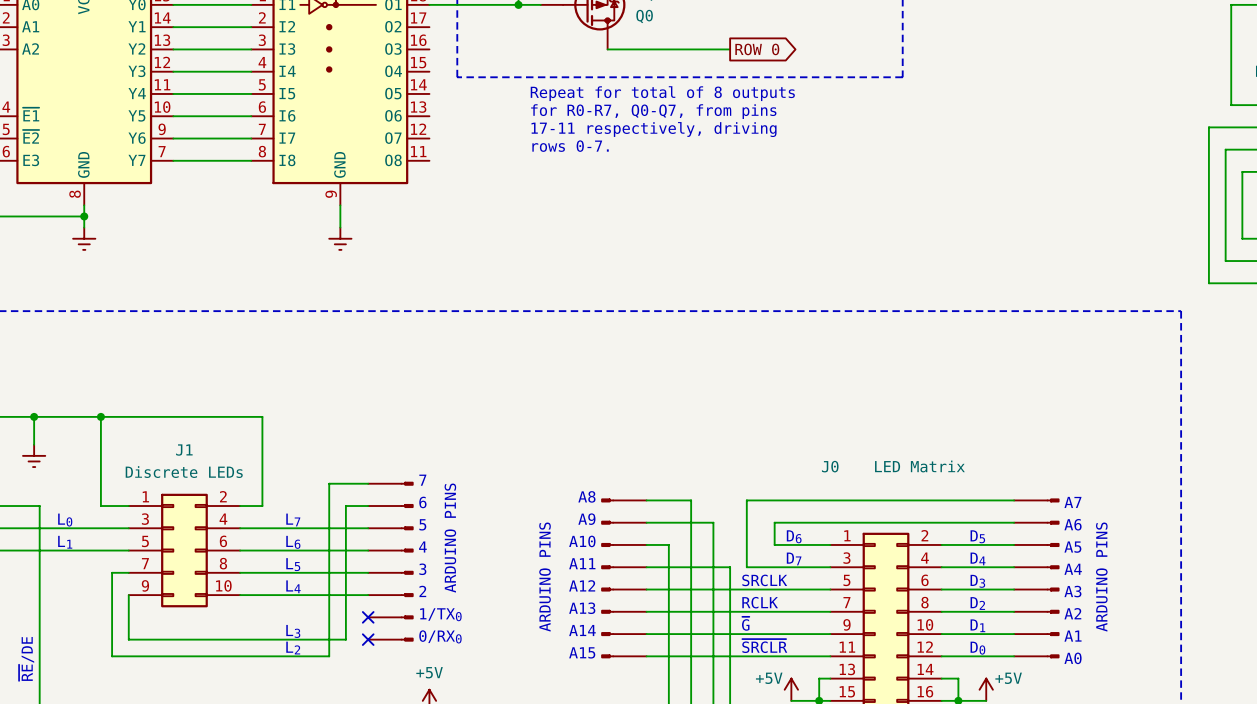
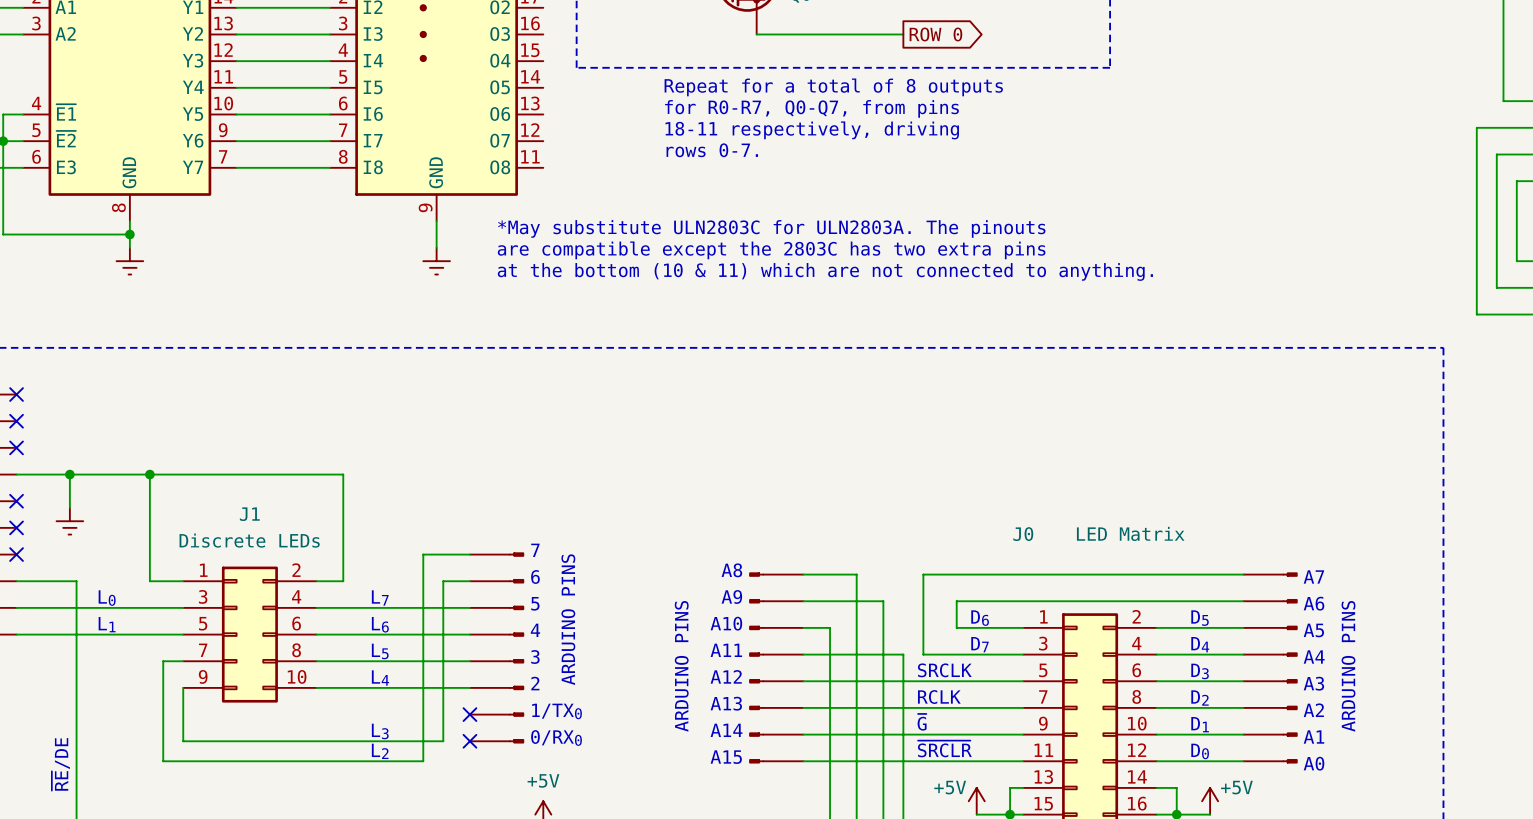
text: Repeat for total of 8 outputs (662, 93) -> Repeat for a total of 8 outputs (833, 87)
text: 17-11 respectively, driving (654, 129) -> 18-11 respectively, driving (812, 130)
text: none -> *May substitute ULN2803C for ULN2803A. The pinouts (771, 228)
text: none -> are compatible except the 2803C has two extra pins (771, 250)
text: none -> at the bottom (10 & 11) which are not connected to anything. (825, 271)

